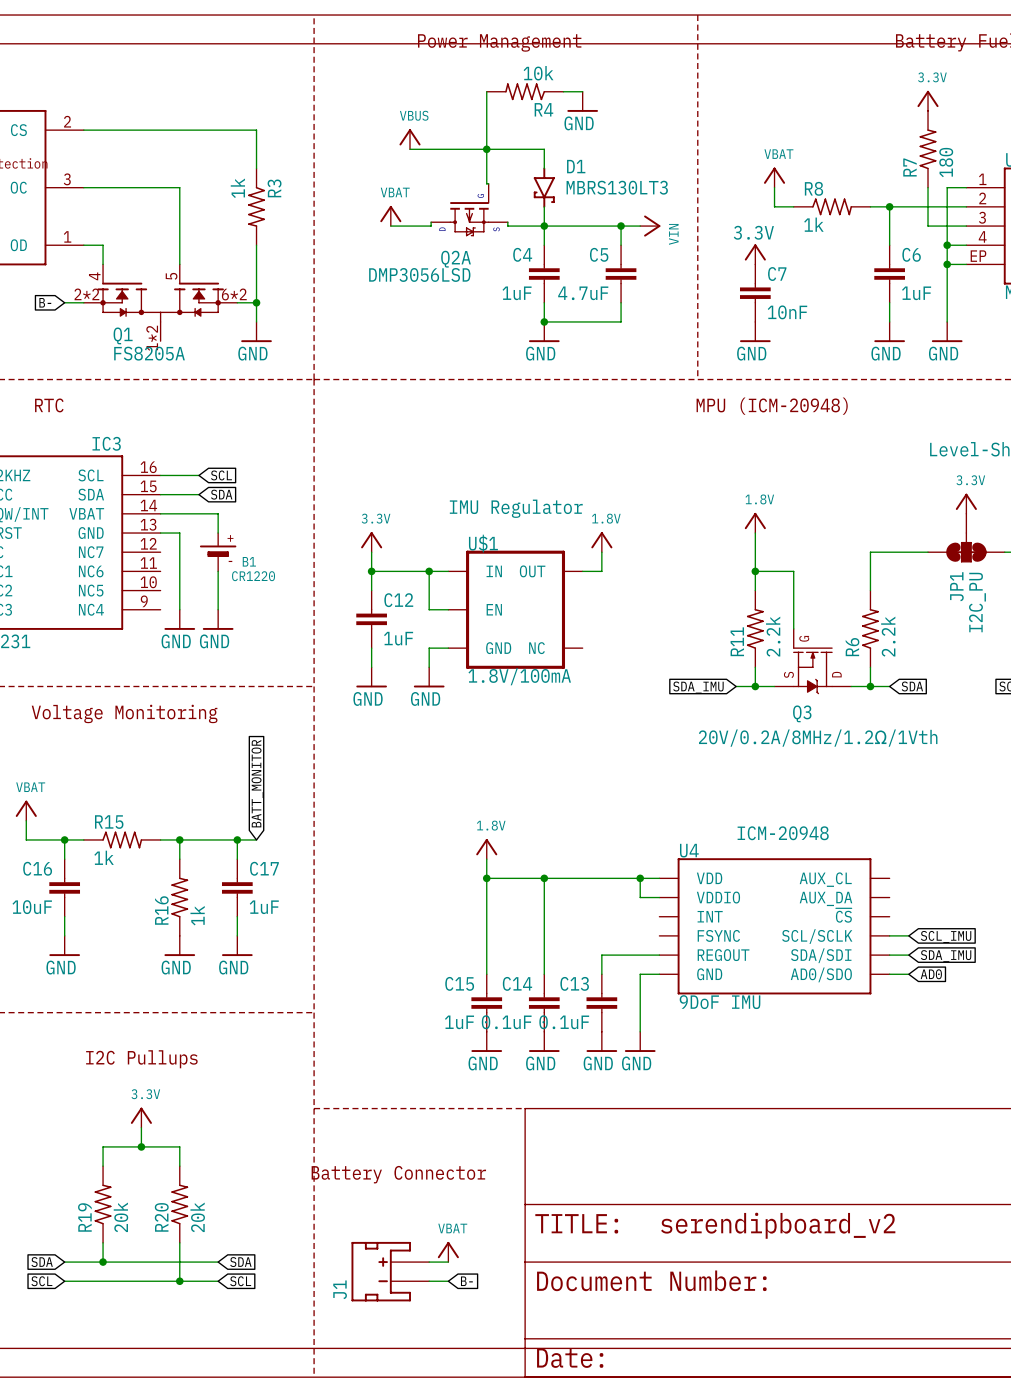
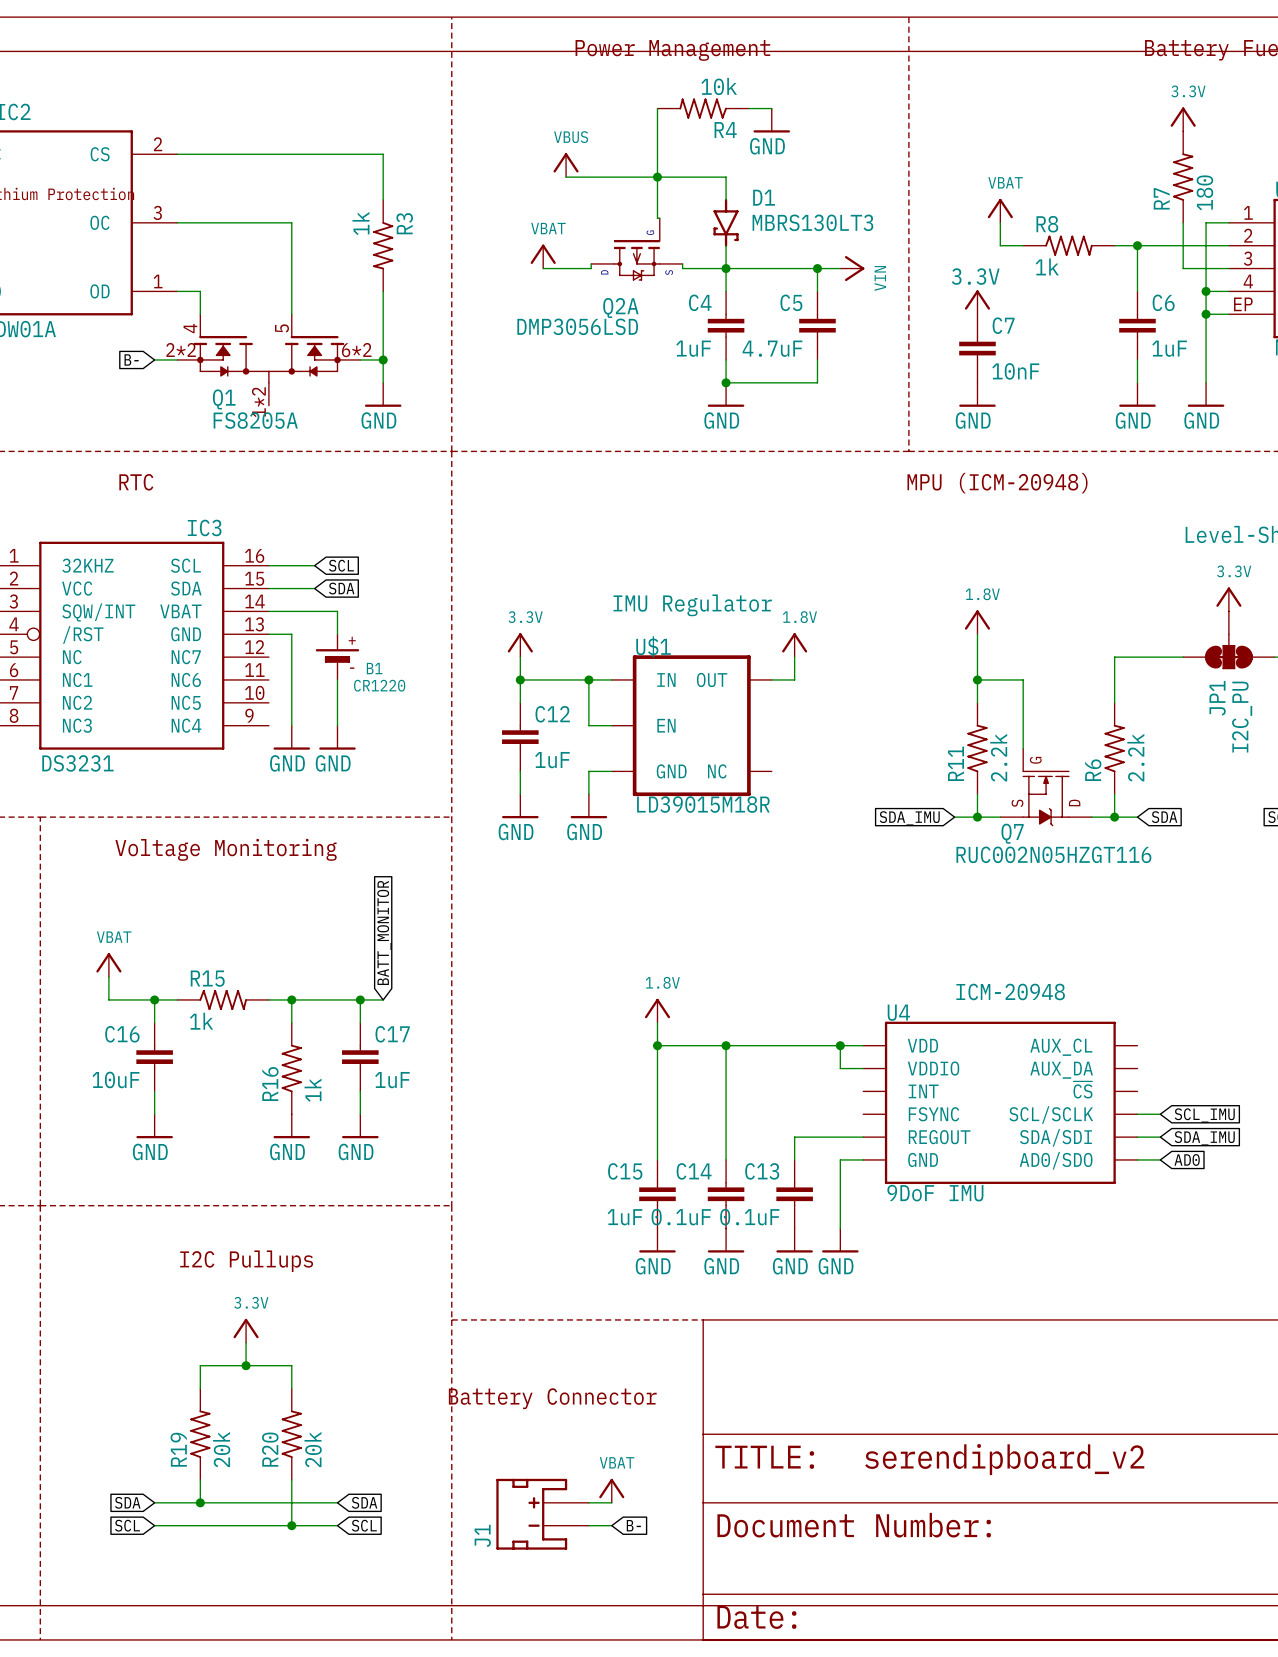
U$1 value: 1.8V/100mA (519, 676) -> LD39015M18R (703, 804)
Q3 name: Q3 (802, 713) -> Q7 (1012, 833)
Q3 value: 20V/0.2A/8MHz/1.2Ω/1Vth (818, 738) -> RUC002N05HZGT116 (1053, 854)

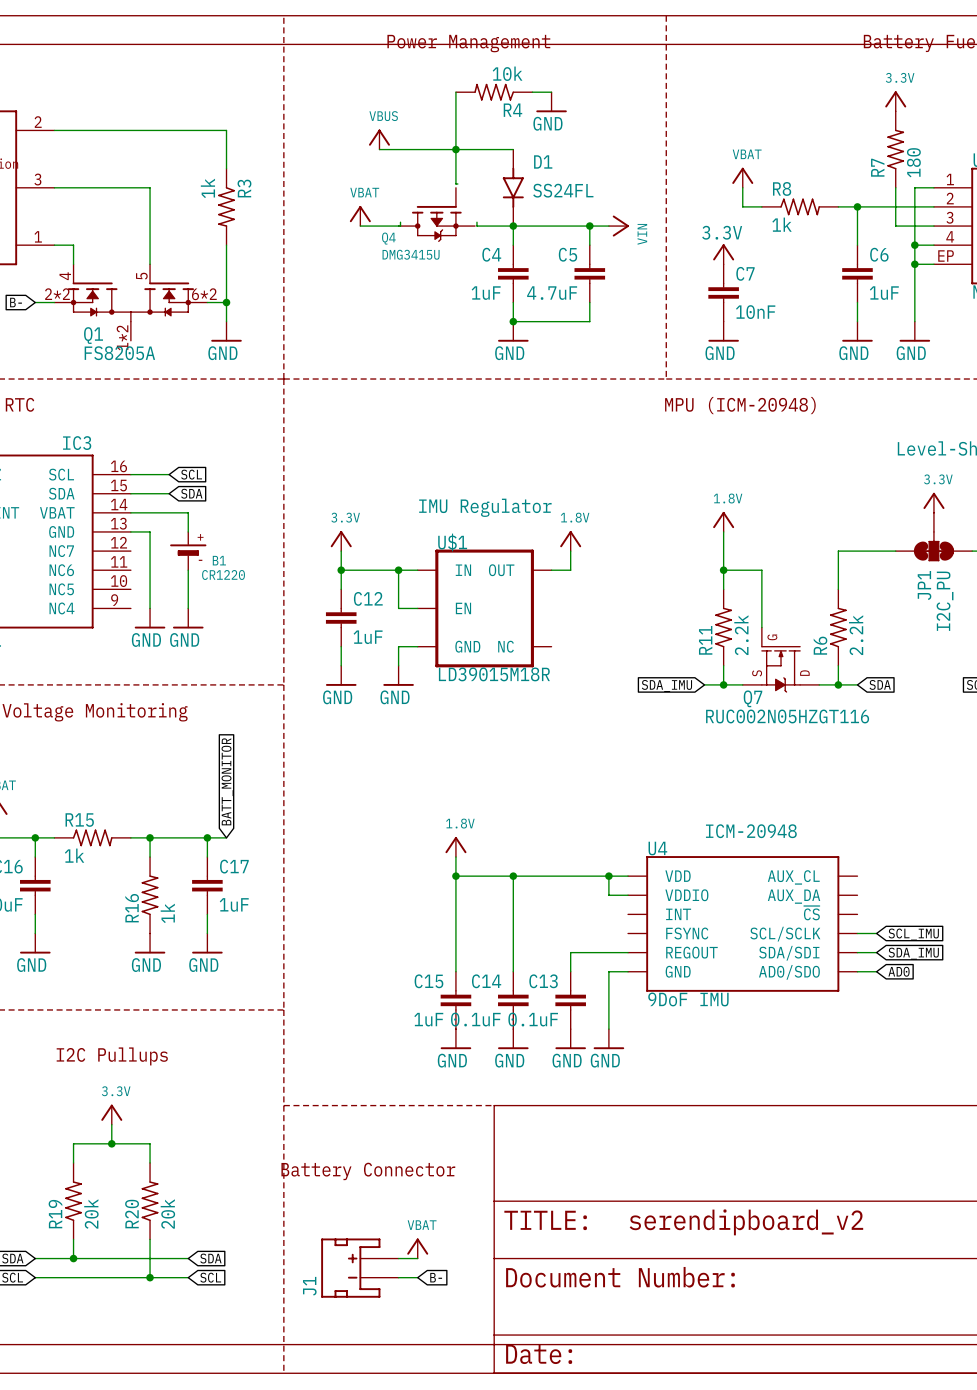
D1 symbol: [713, 198, 739, 247] -> [502, 149, 524, 227]
D1 value: MBRS130LT3 (812, 222) -> SS24FL (563, 190)
Q2A: DMP3056LSD (636, 249) -> none
Q4: none -> DMG3415U (436, 214)

